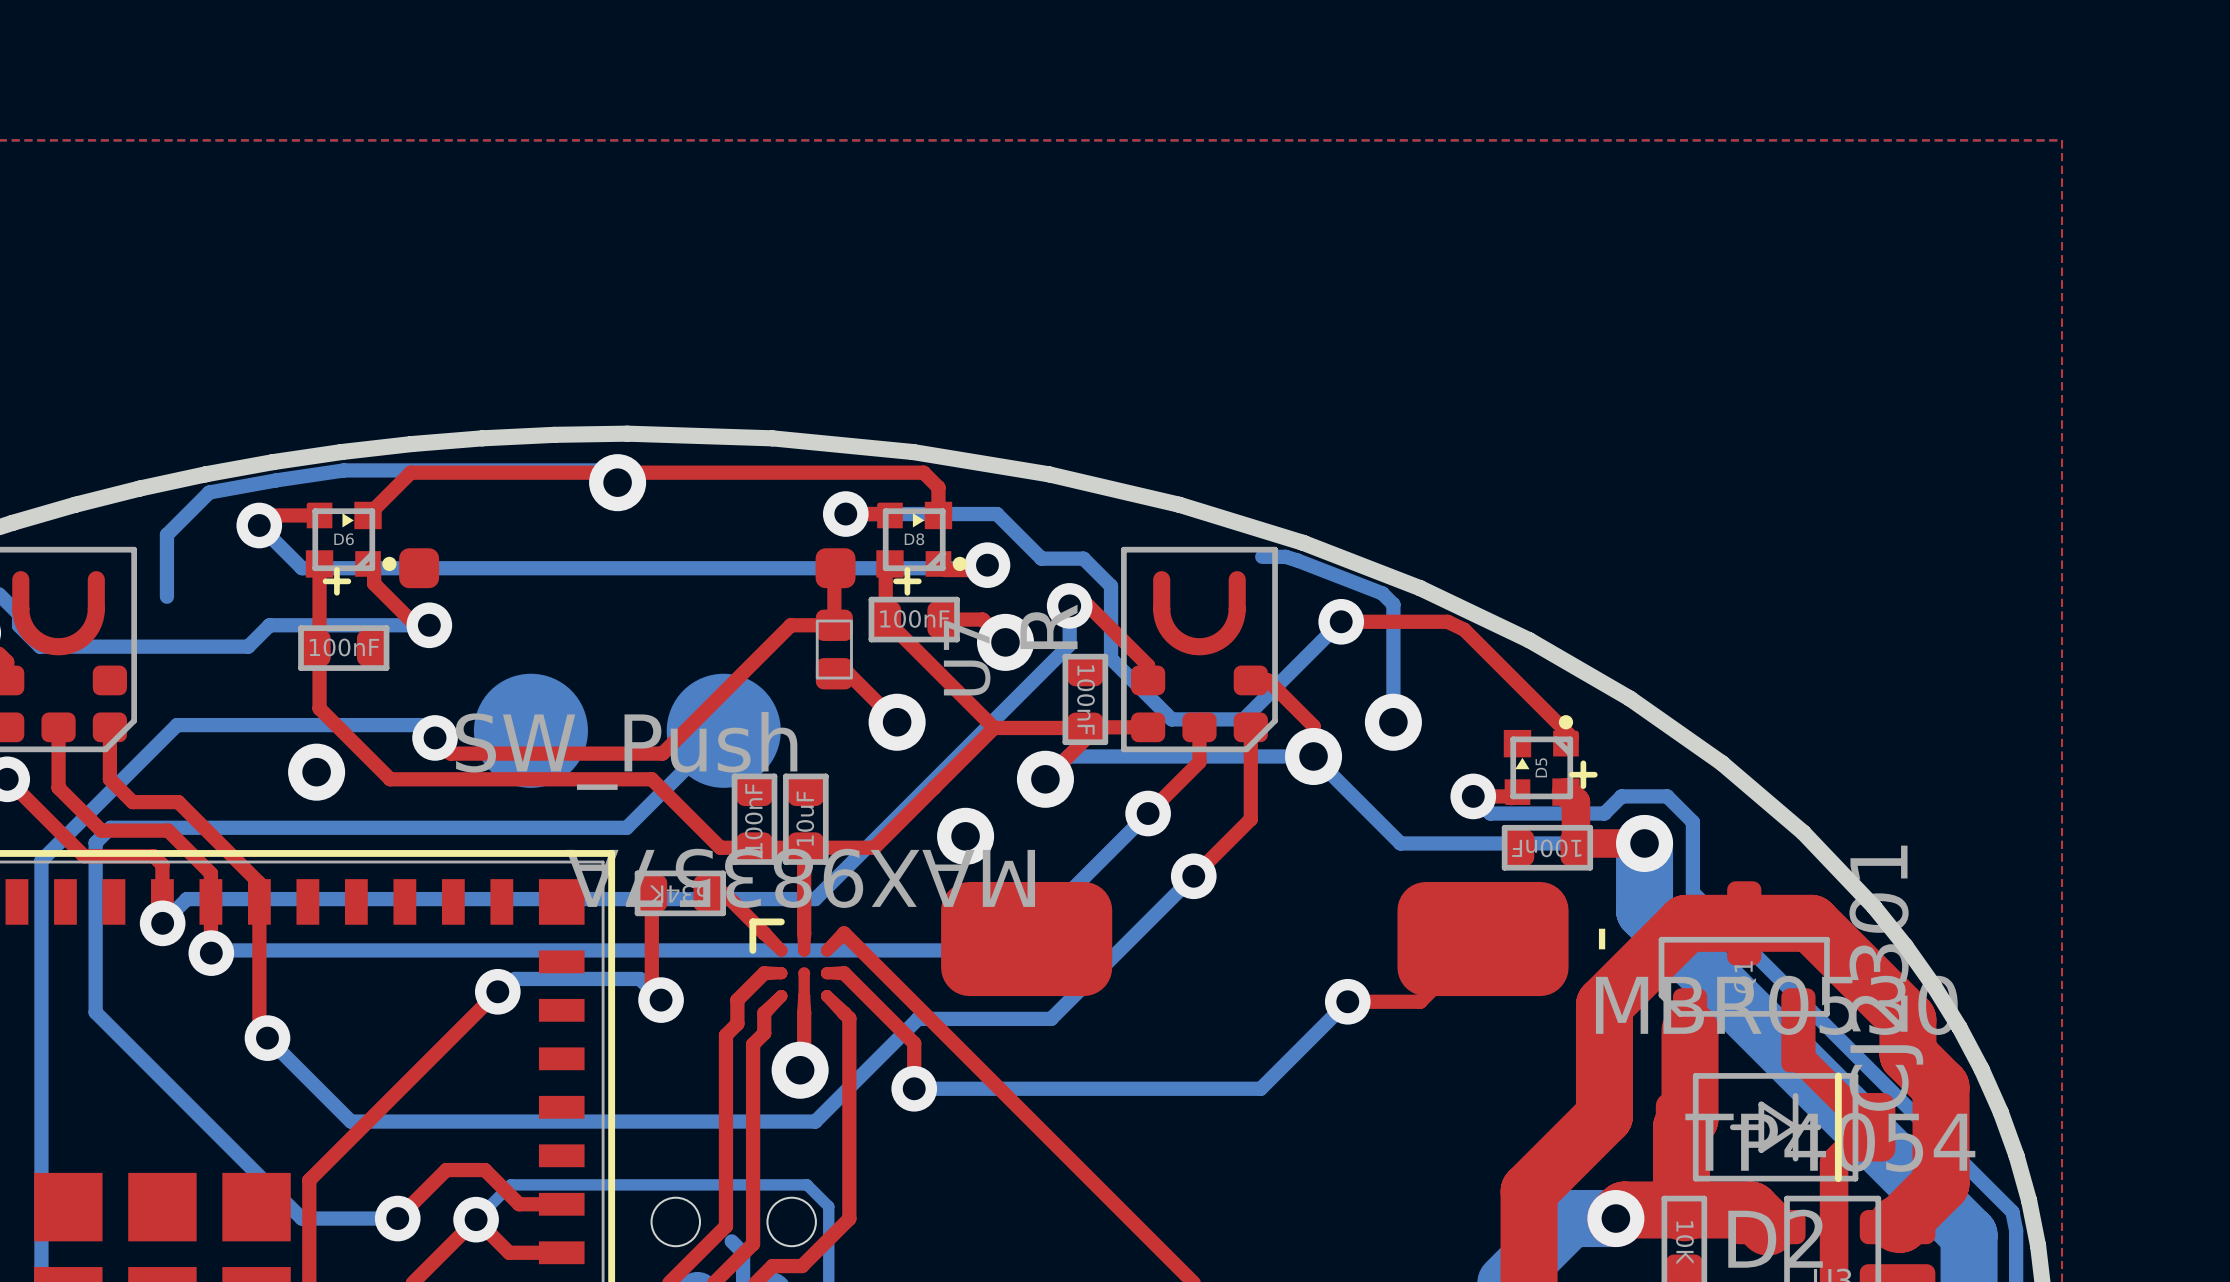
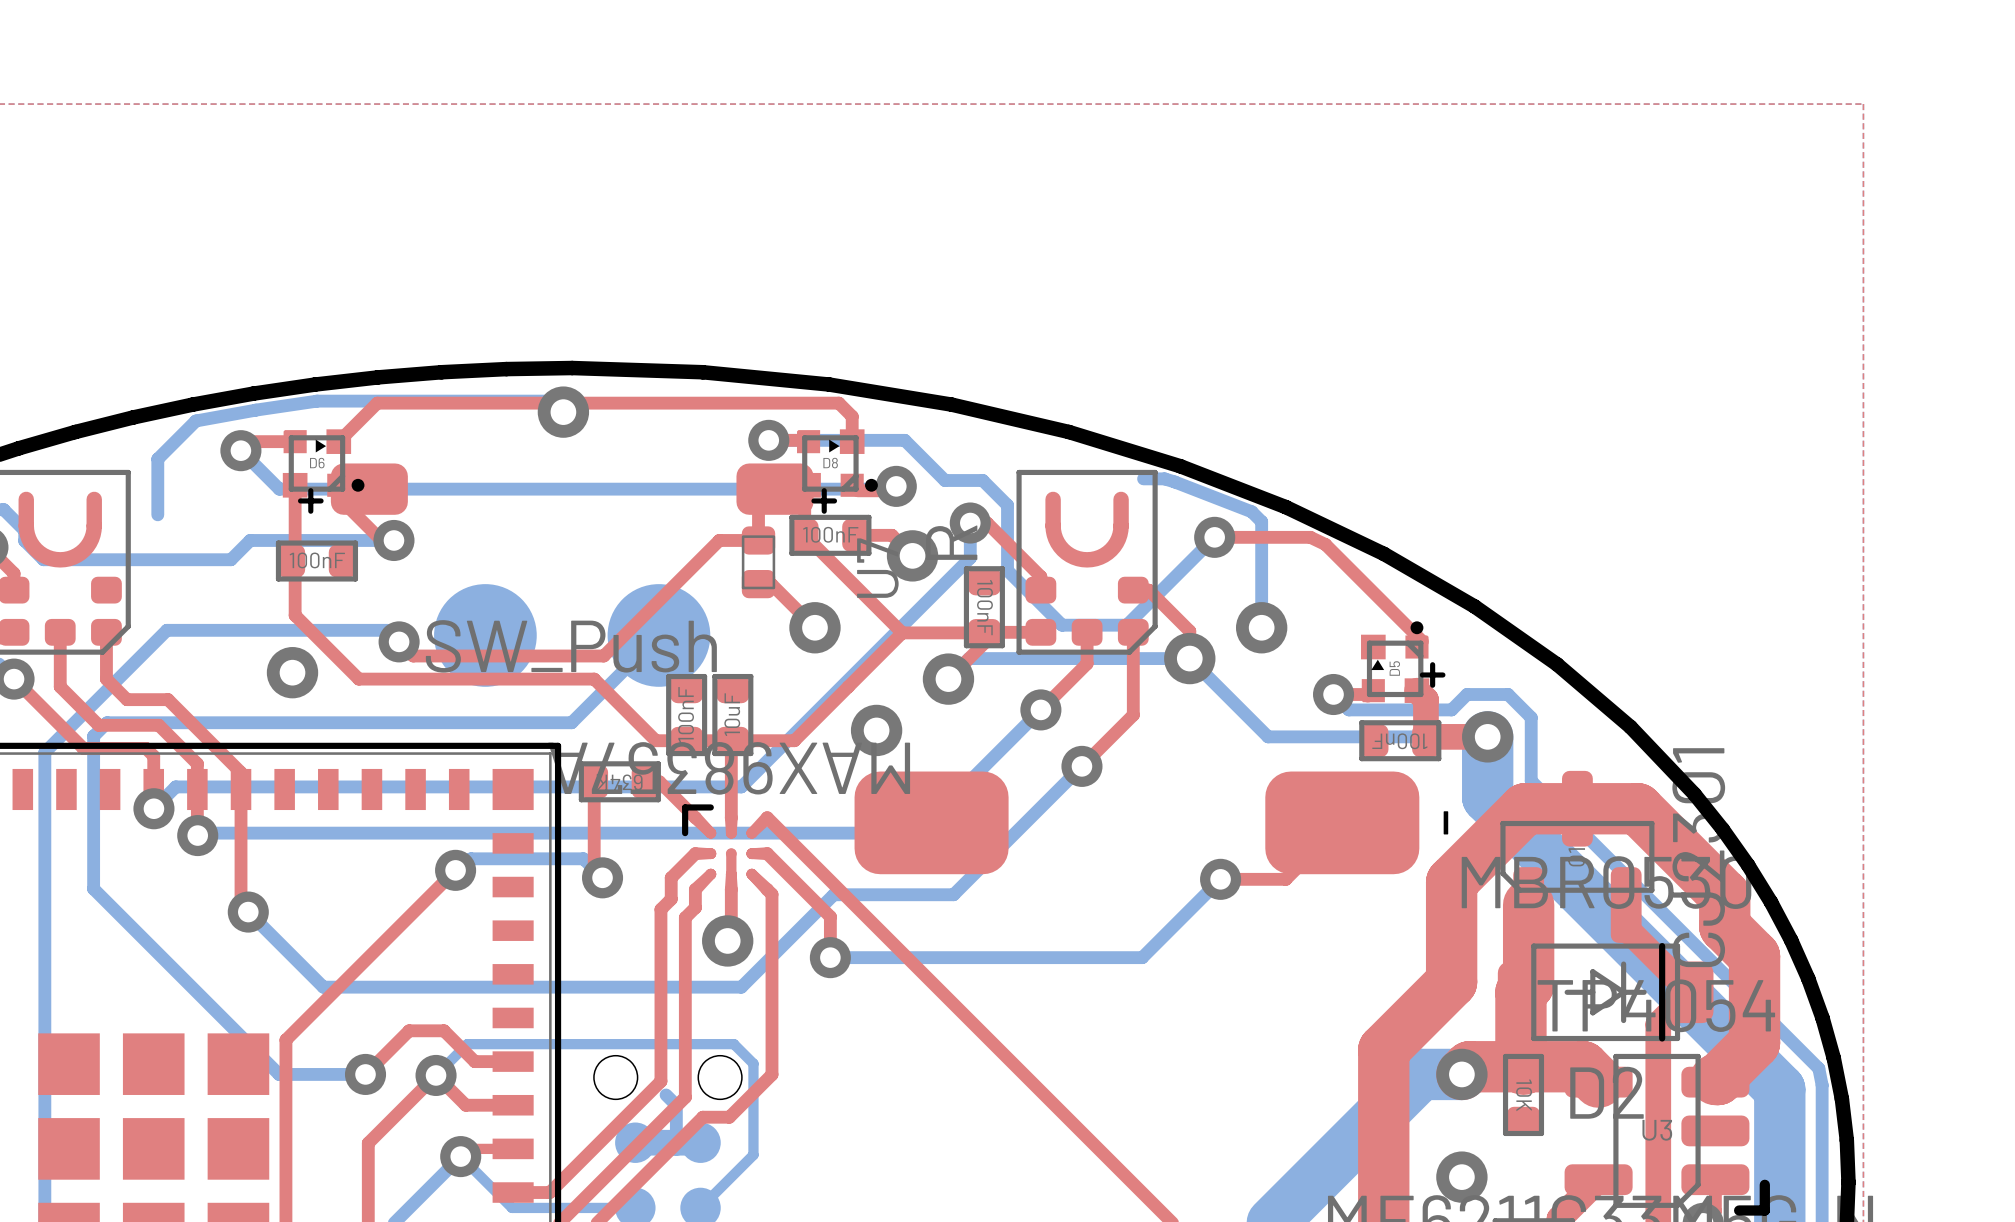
part footprint: [399, 548, 856, 589] -> [330, 463, 814, 515]

